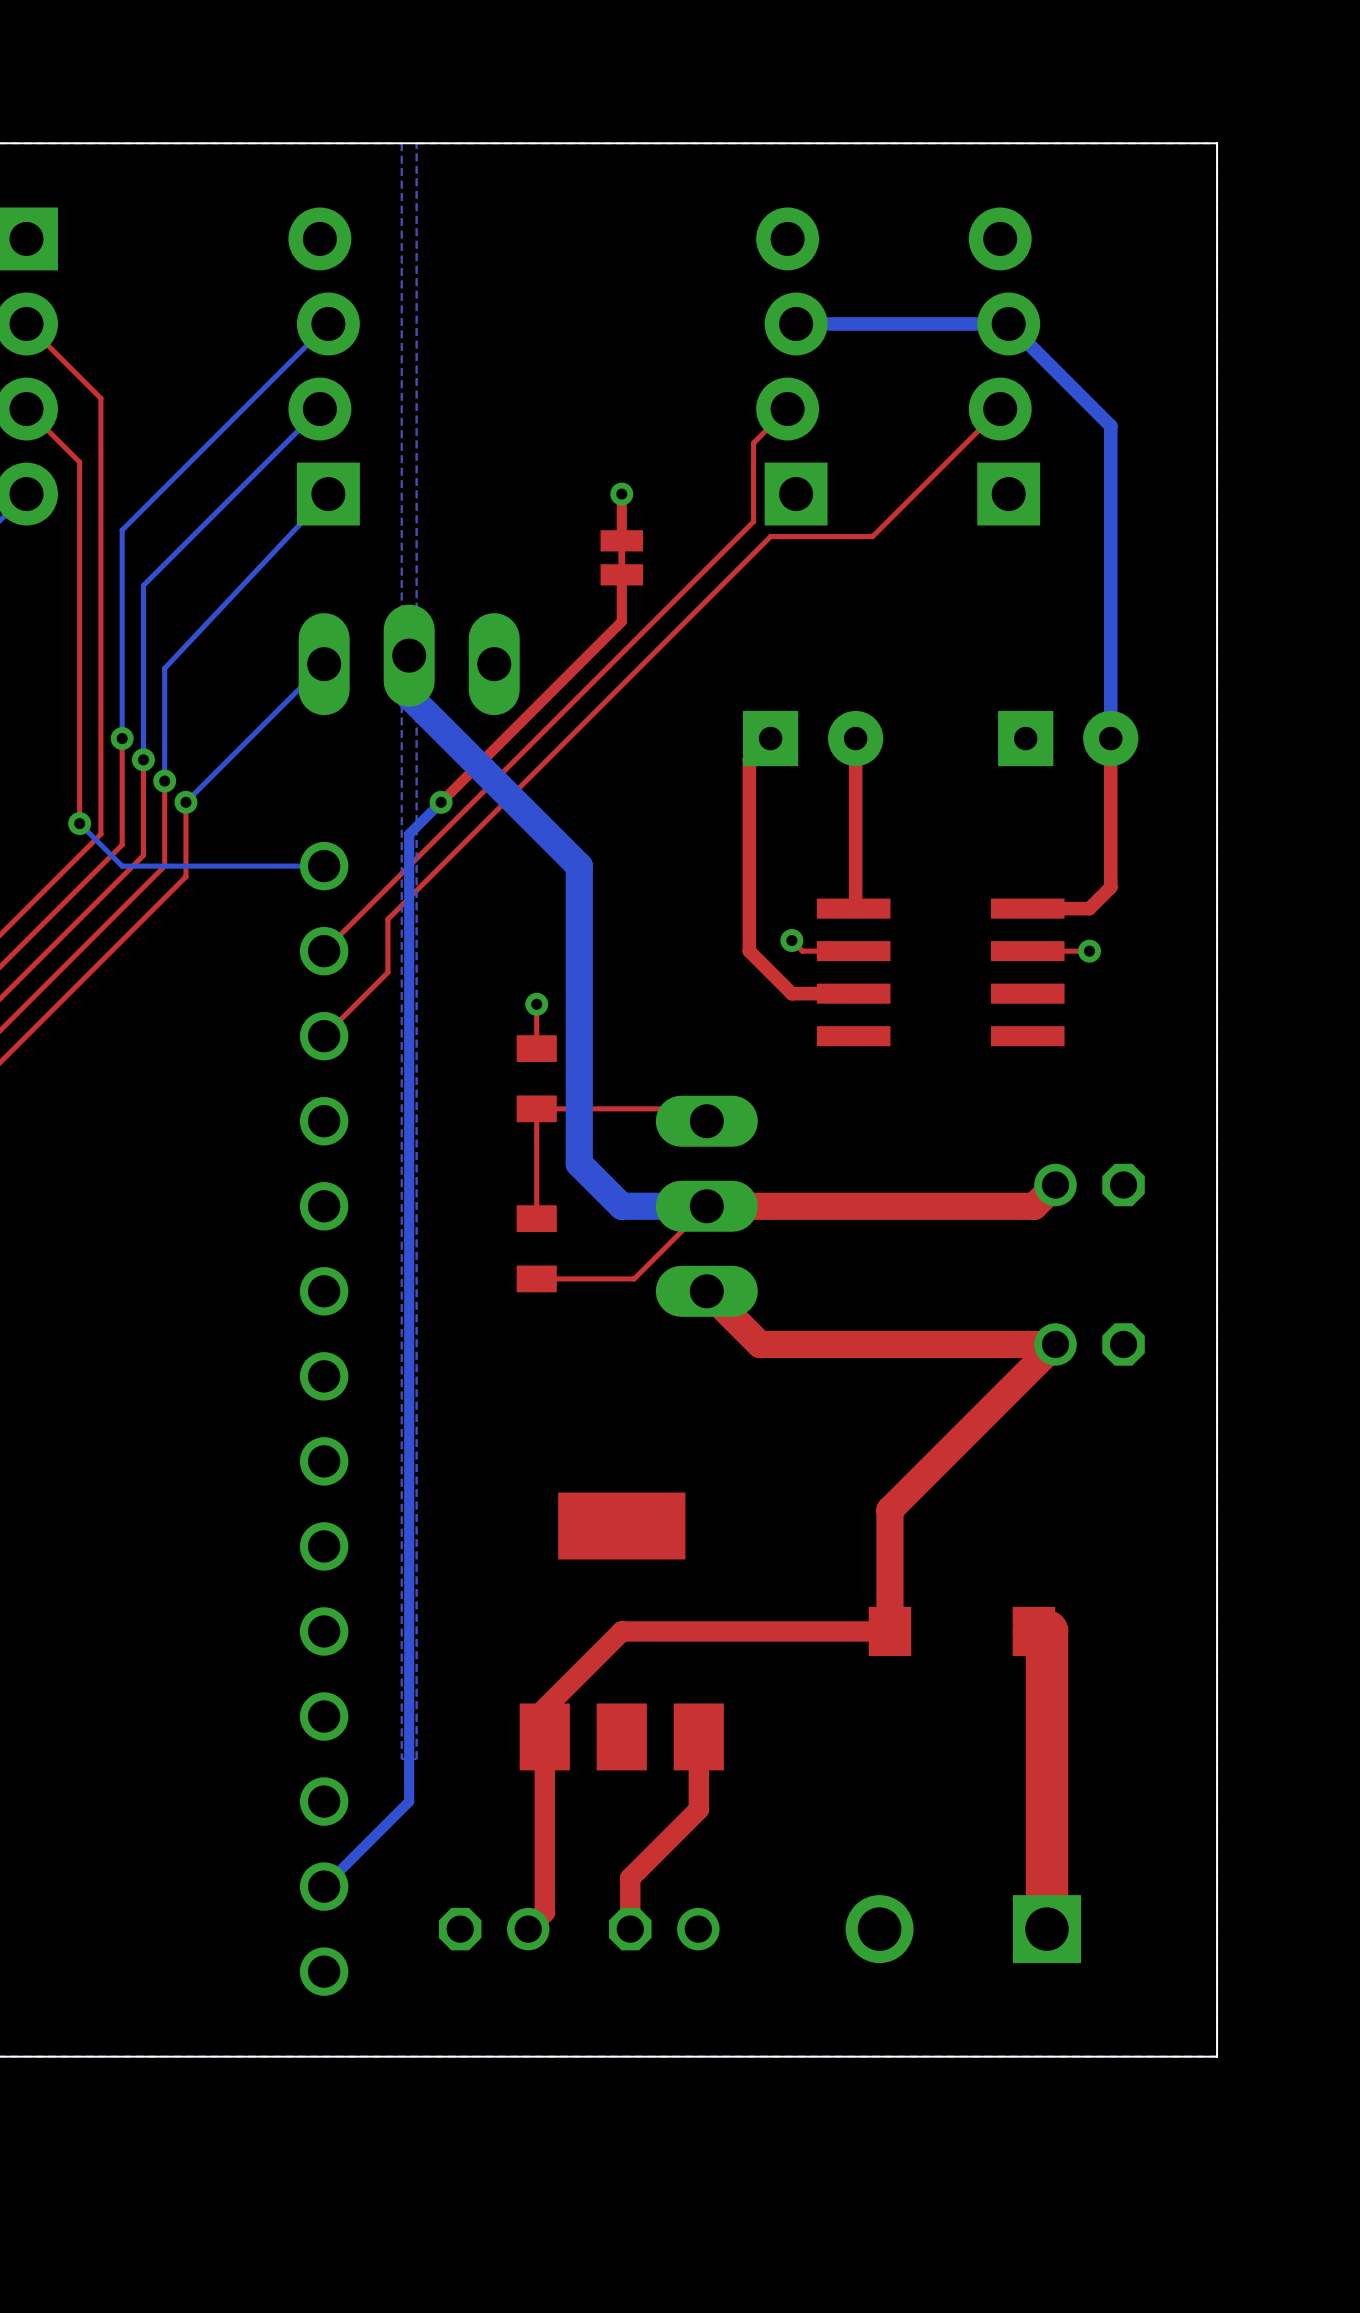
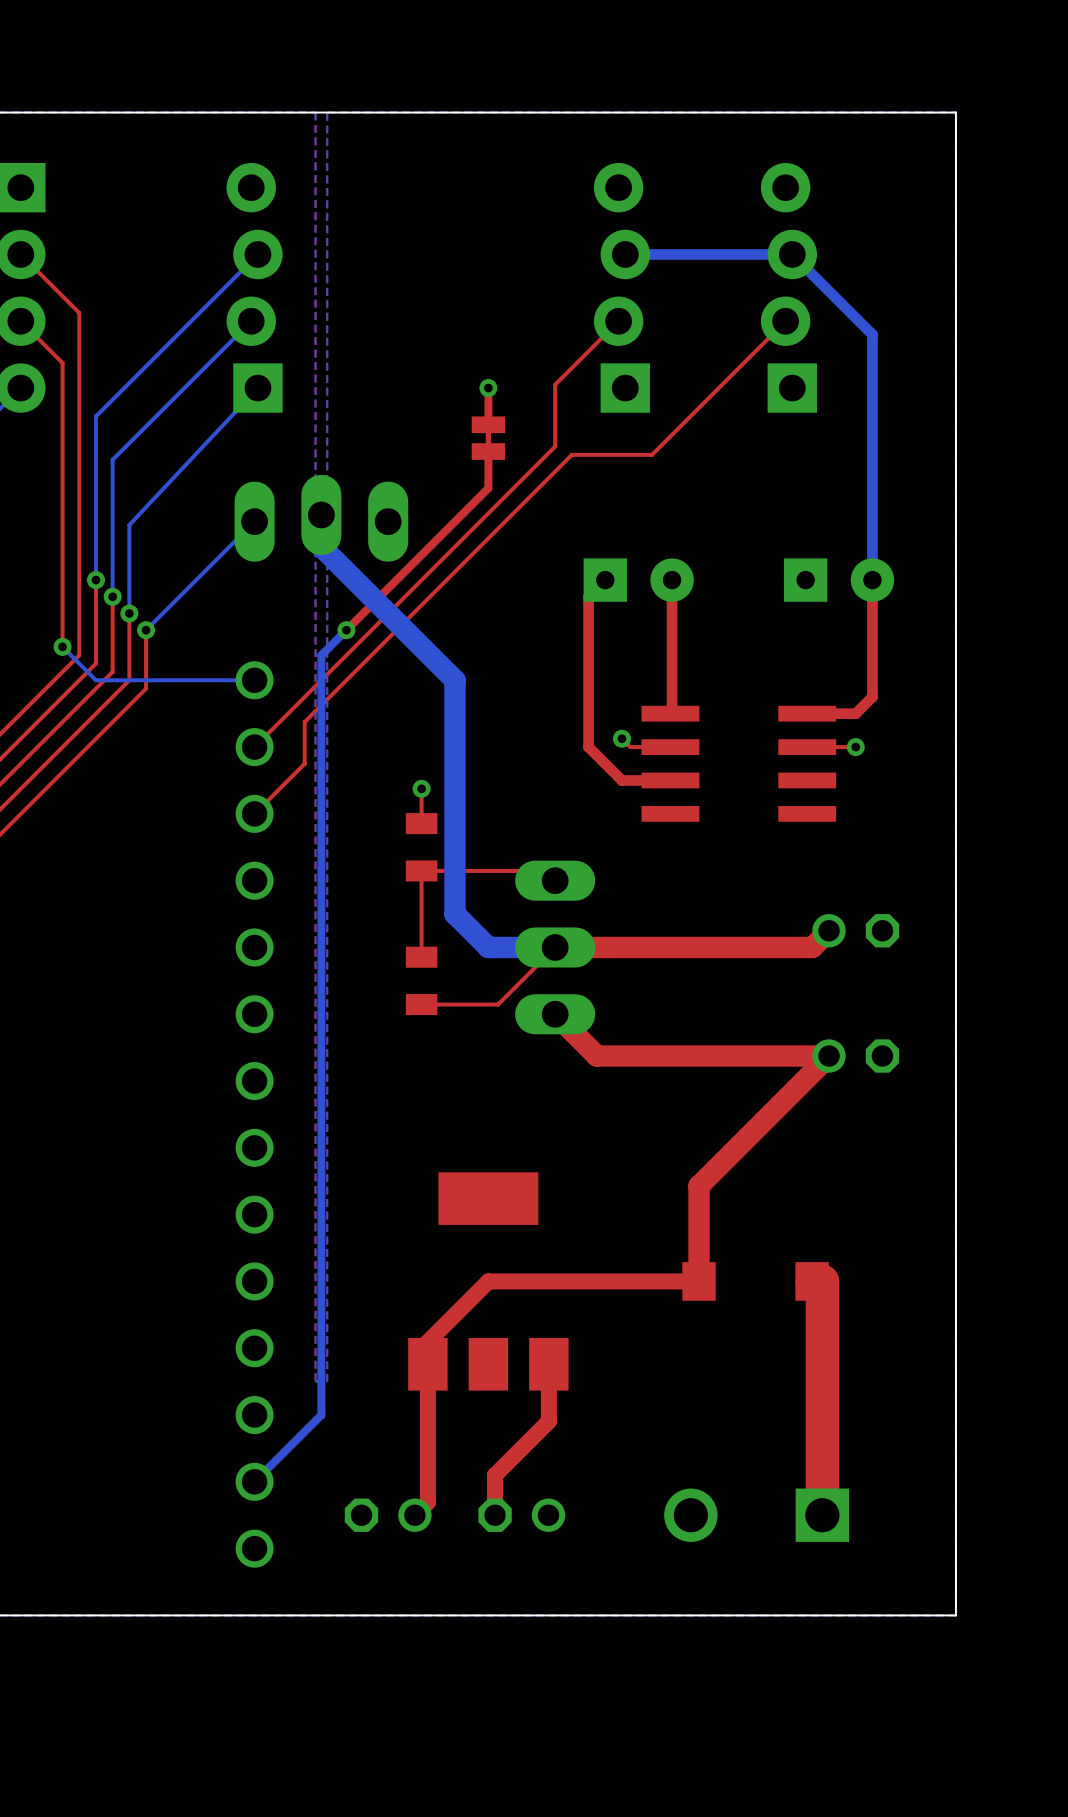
top track: (753, 443) (753, 521) (706, 568) -> (591, 347) (555, 384) (555, 446)
top track: (872, 536) (770, 536) (728, 579) -> (685, 421) (652, 454) (571, 454)

